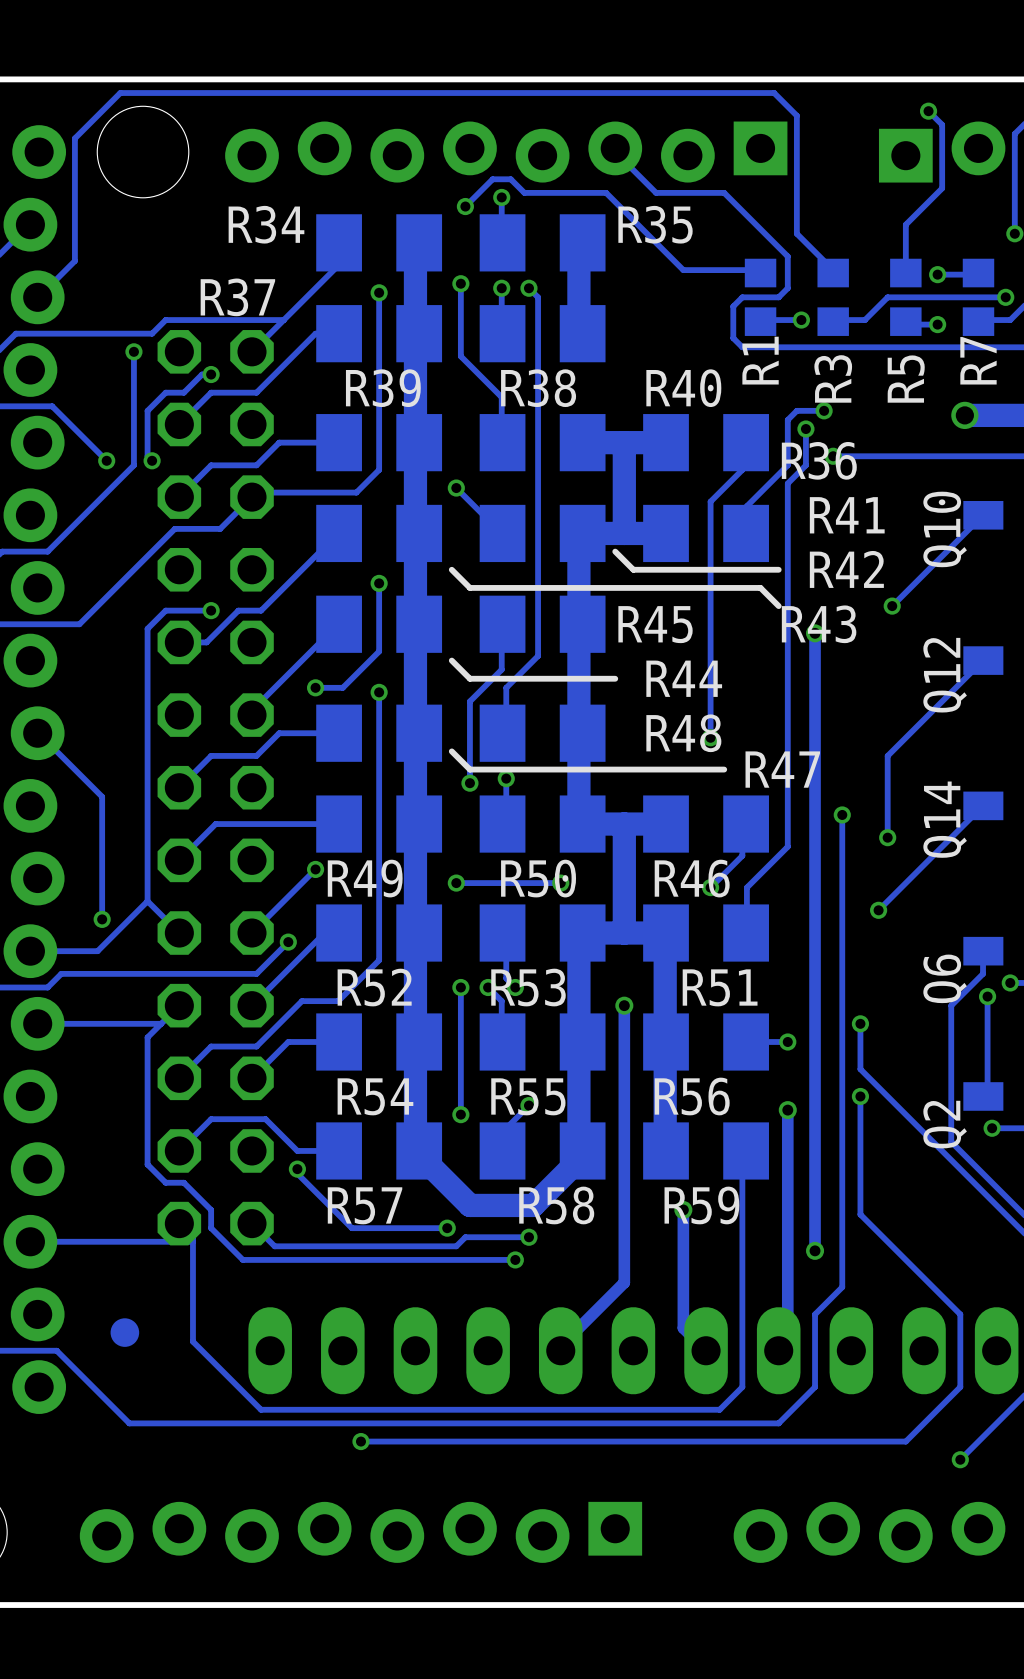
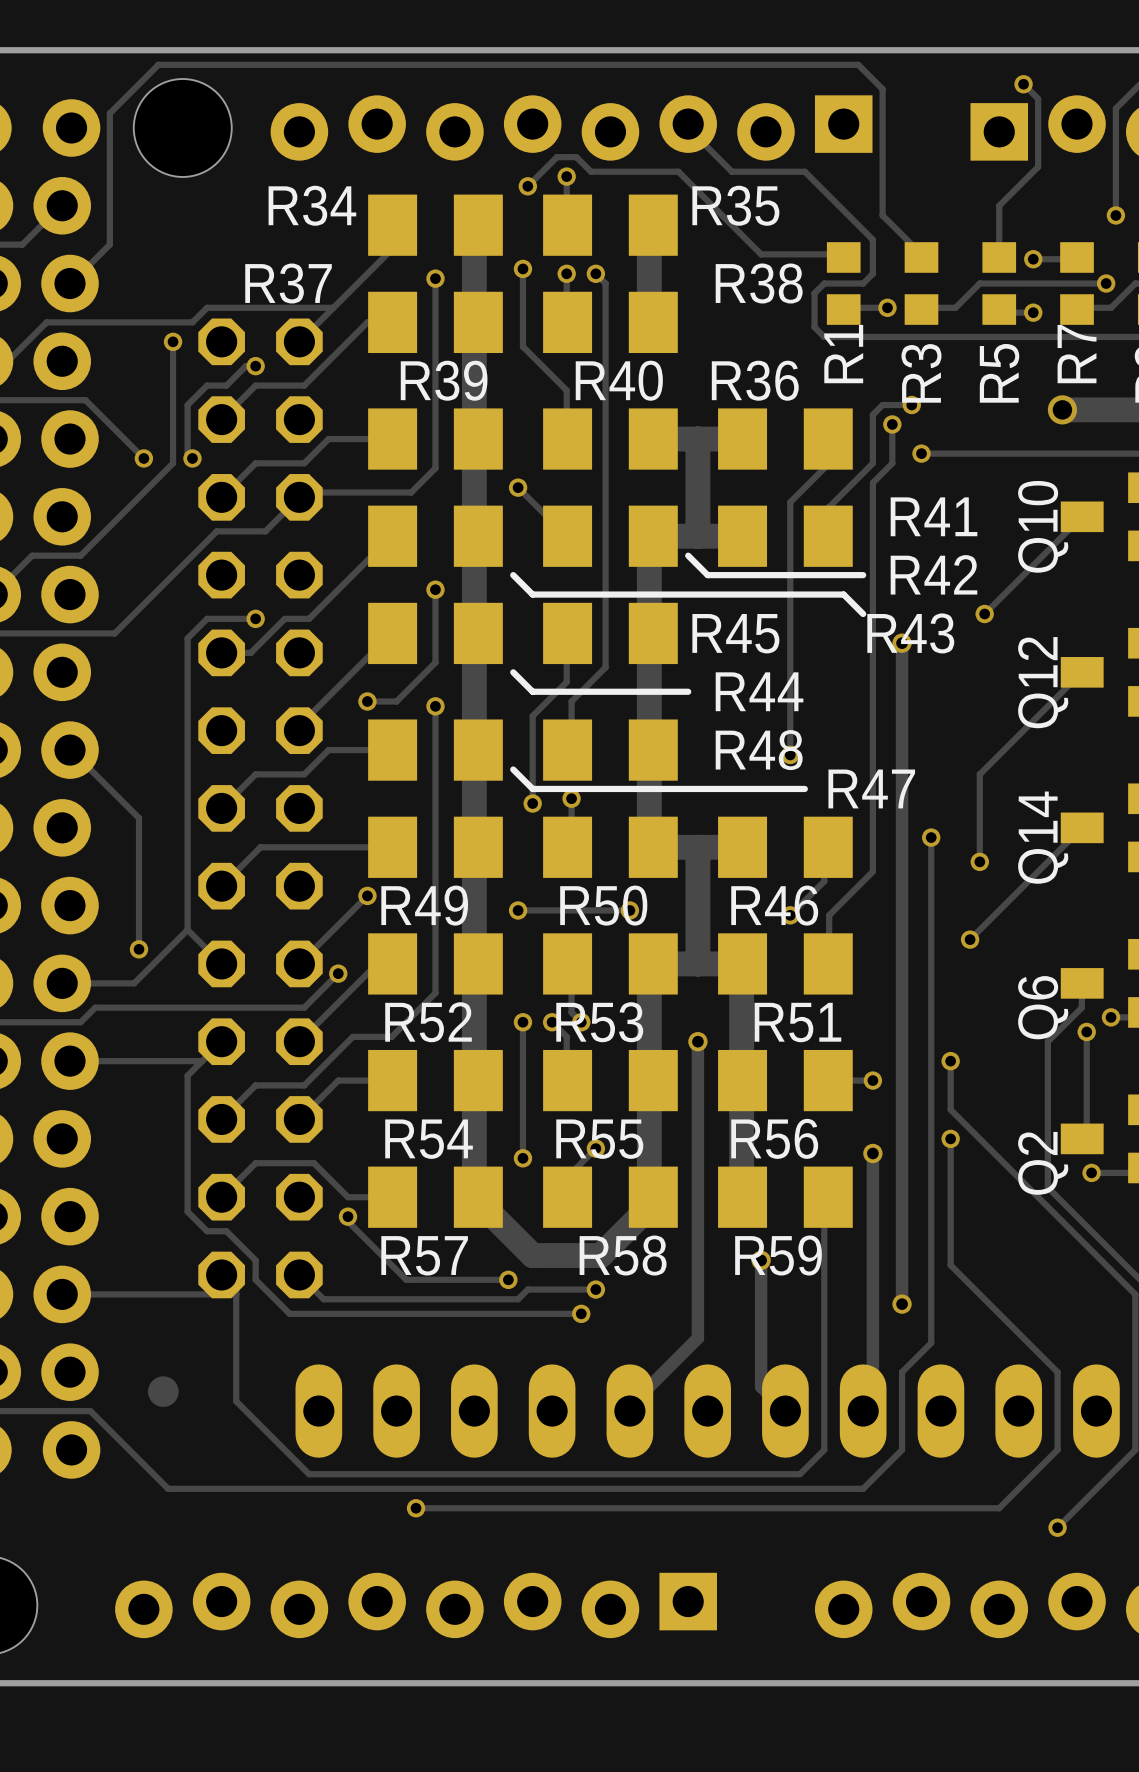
R38 name position: R38 (538, 388) -> R38 (759, 283)
R40 name position: R40 (683, 388) -> R40 (619, 380)
R36 name position: R36 (819, 460) -> R36 (755, 380)

